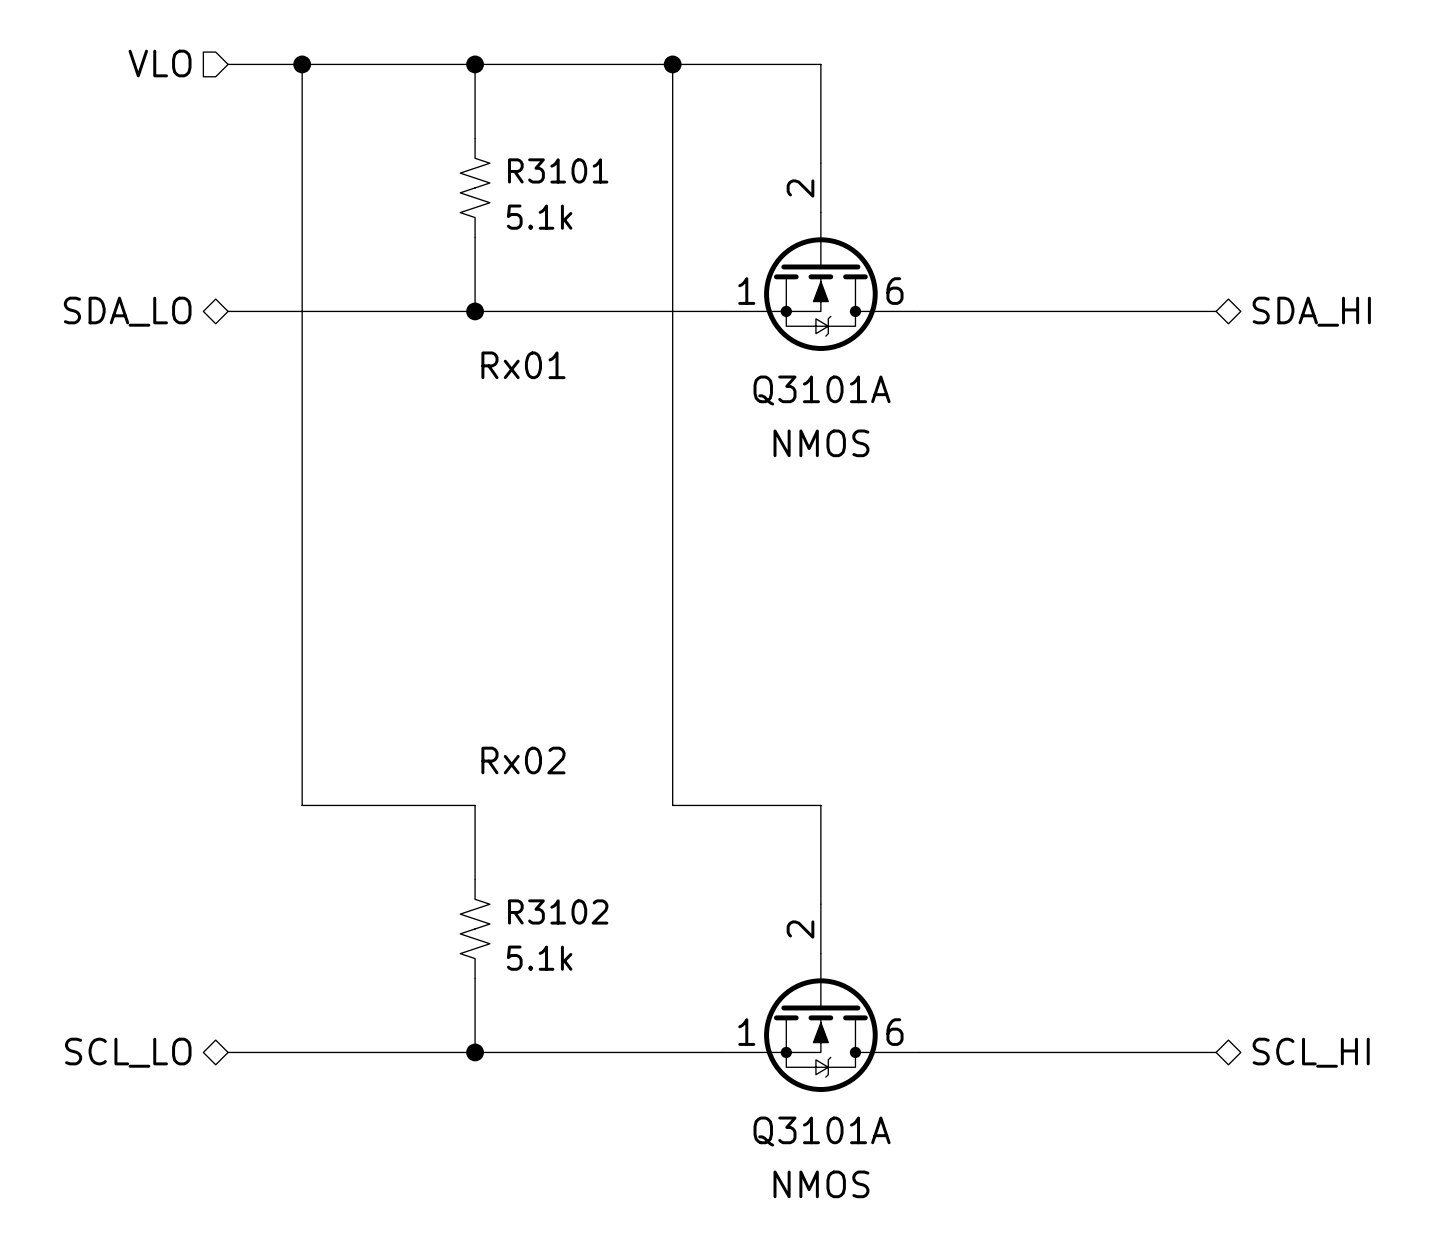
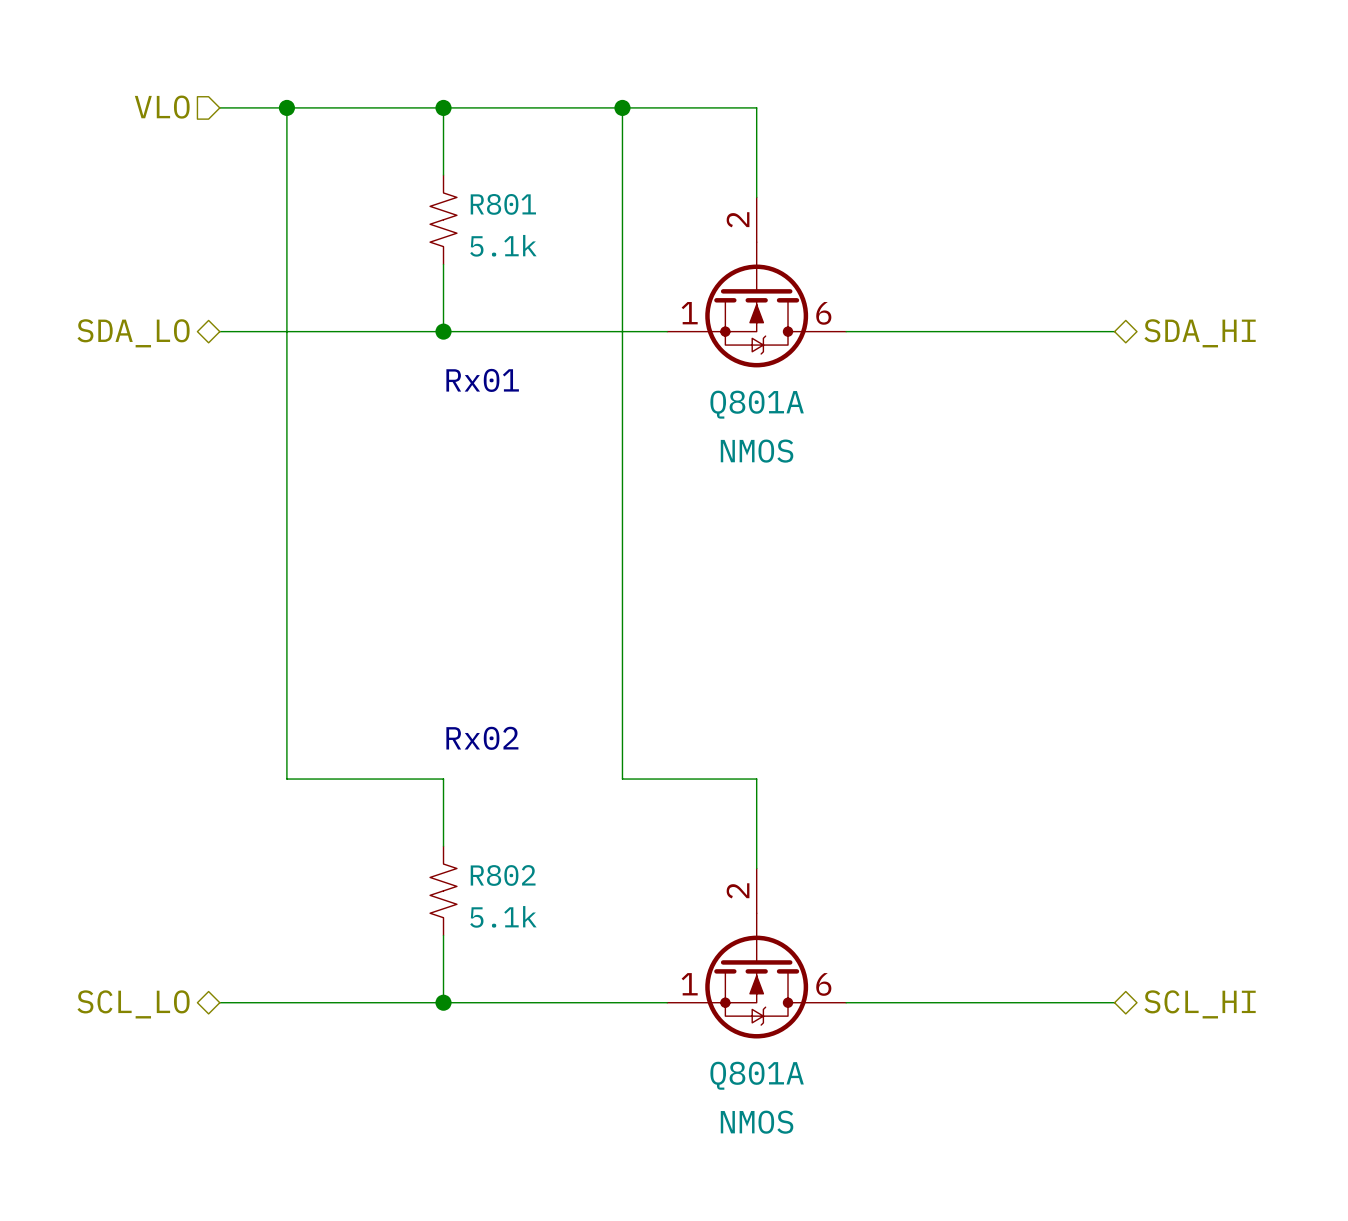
R3101 name: R3101 (558, 170) -> R801 (503, 204)
Q3101A name: Q3101A (822, 390) -> Q801A (757, 404)
R3102 name: R3102 (558, 911) -> R802 (503, 875)
Q3101A name: Q3101A (822, 1131) -> Q801A (757, 1075)

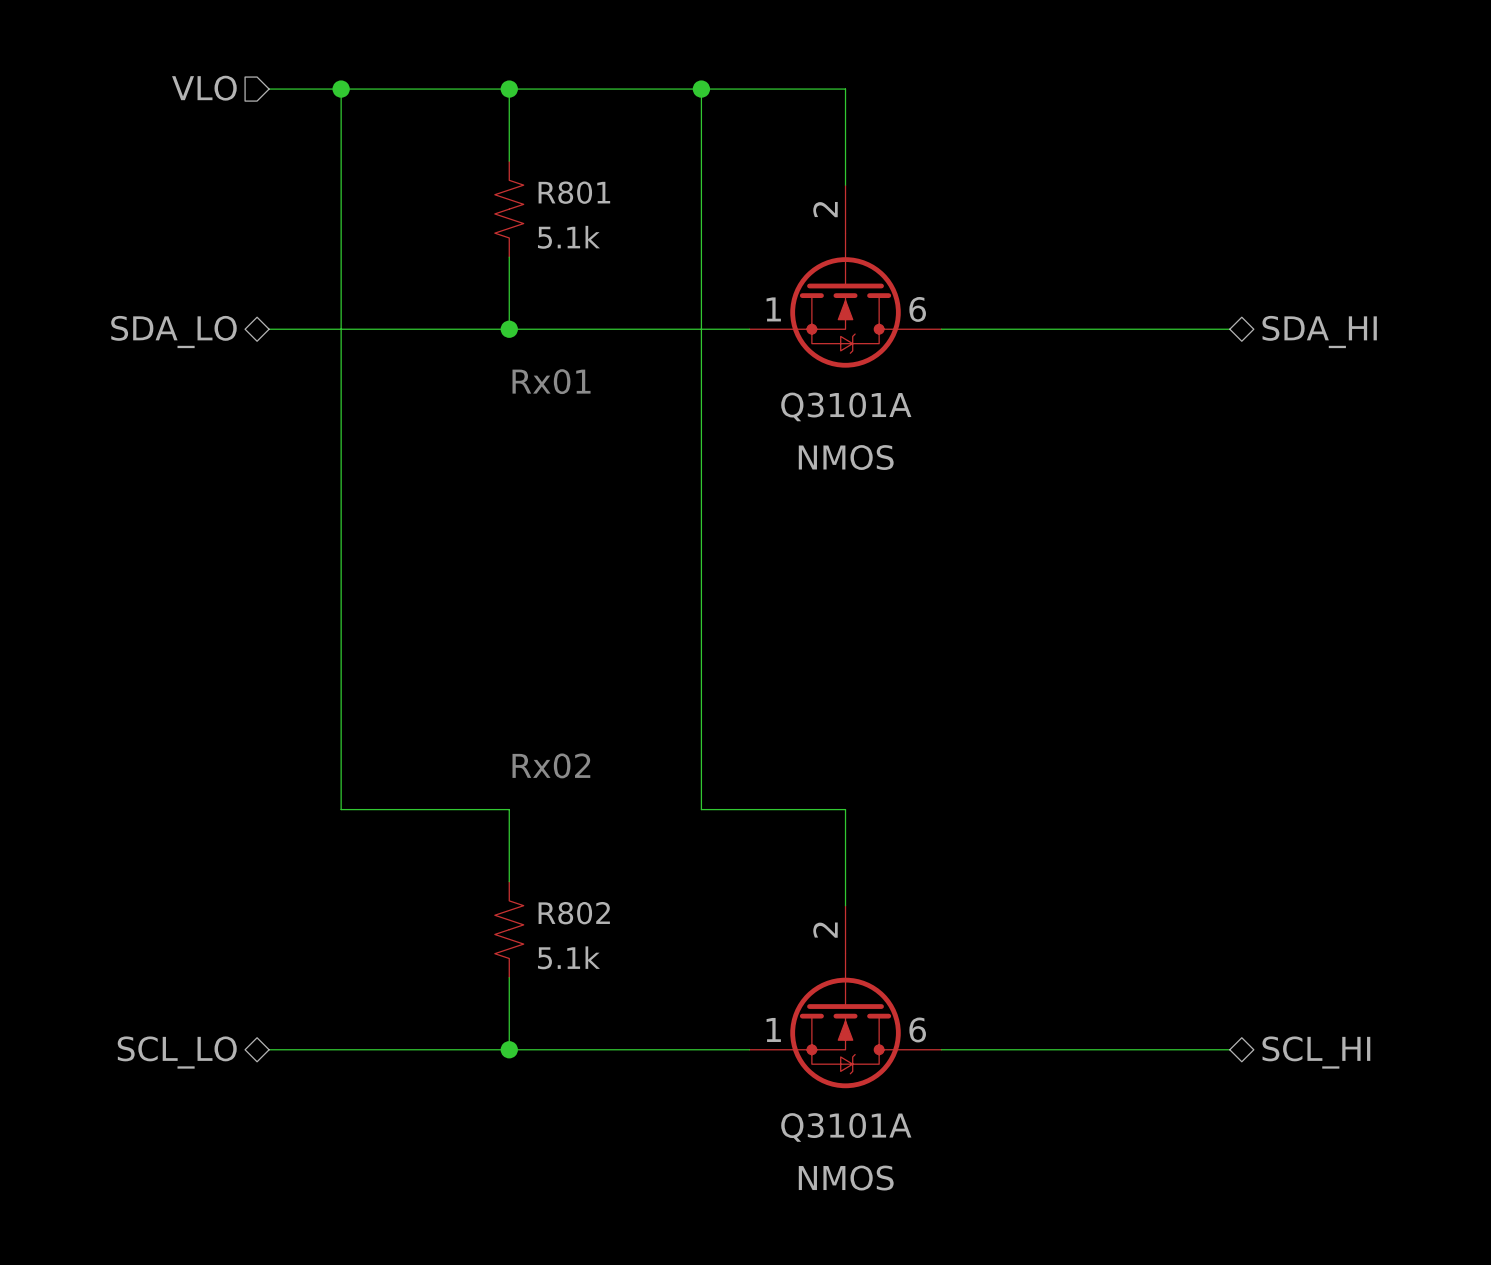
Q801A name: Q801A (757, 404) -> Q3101A (846, 406)
Q801A name: Q801A (757, 1075) -> Q3101A (846, 1127)

